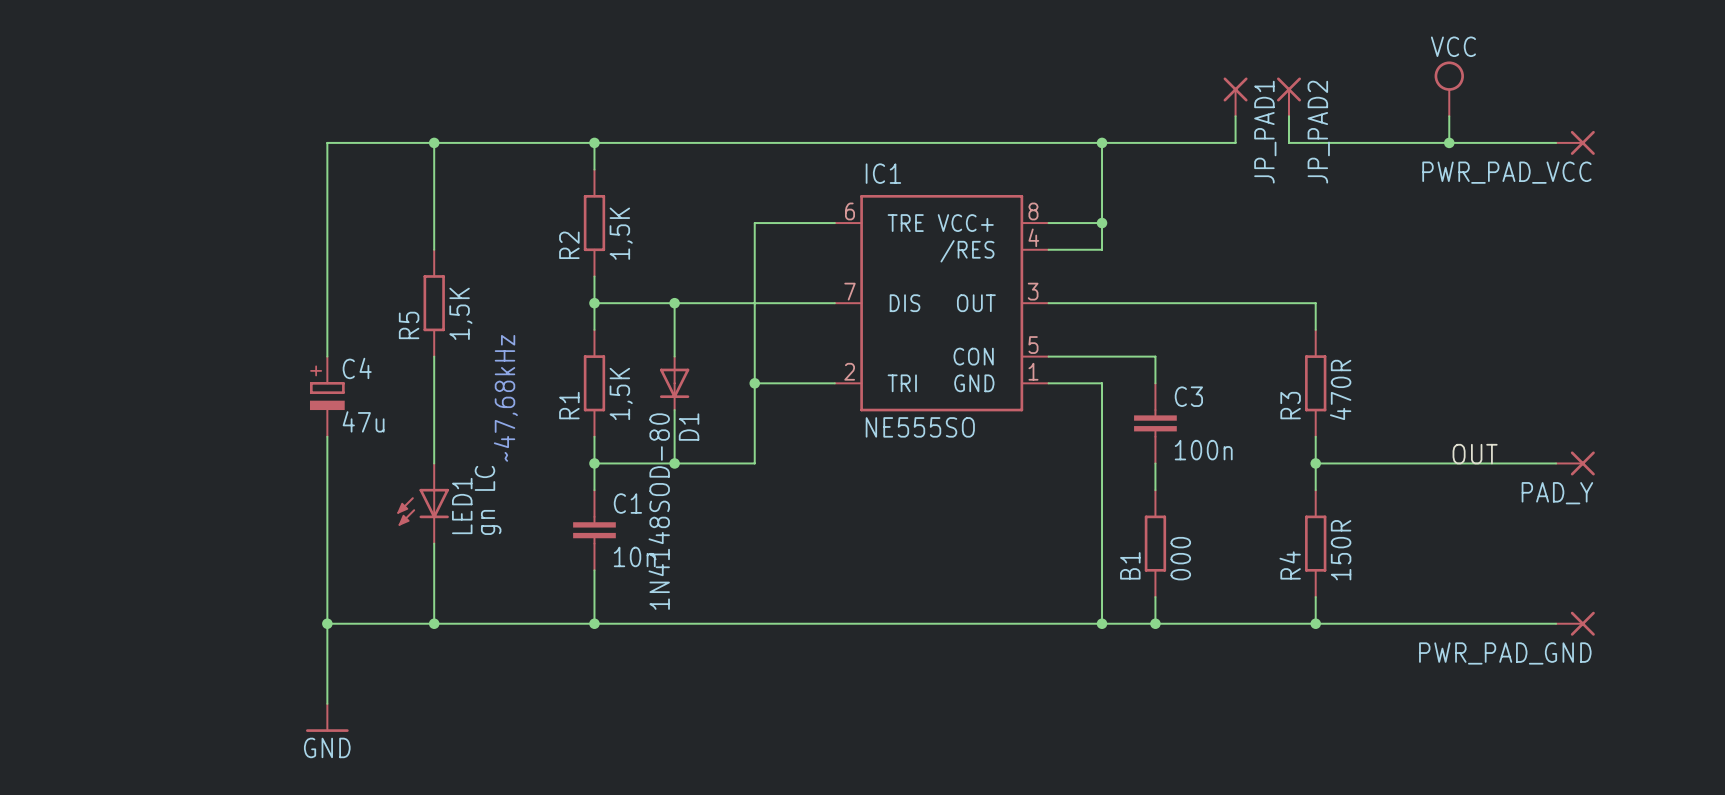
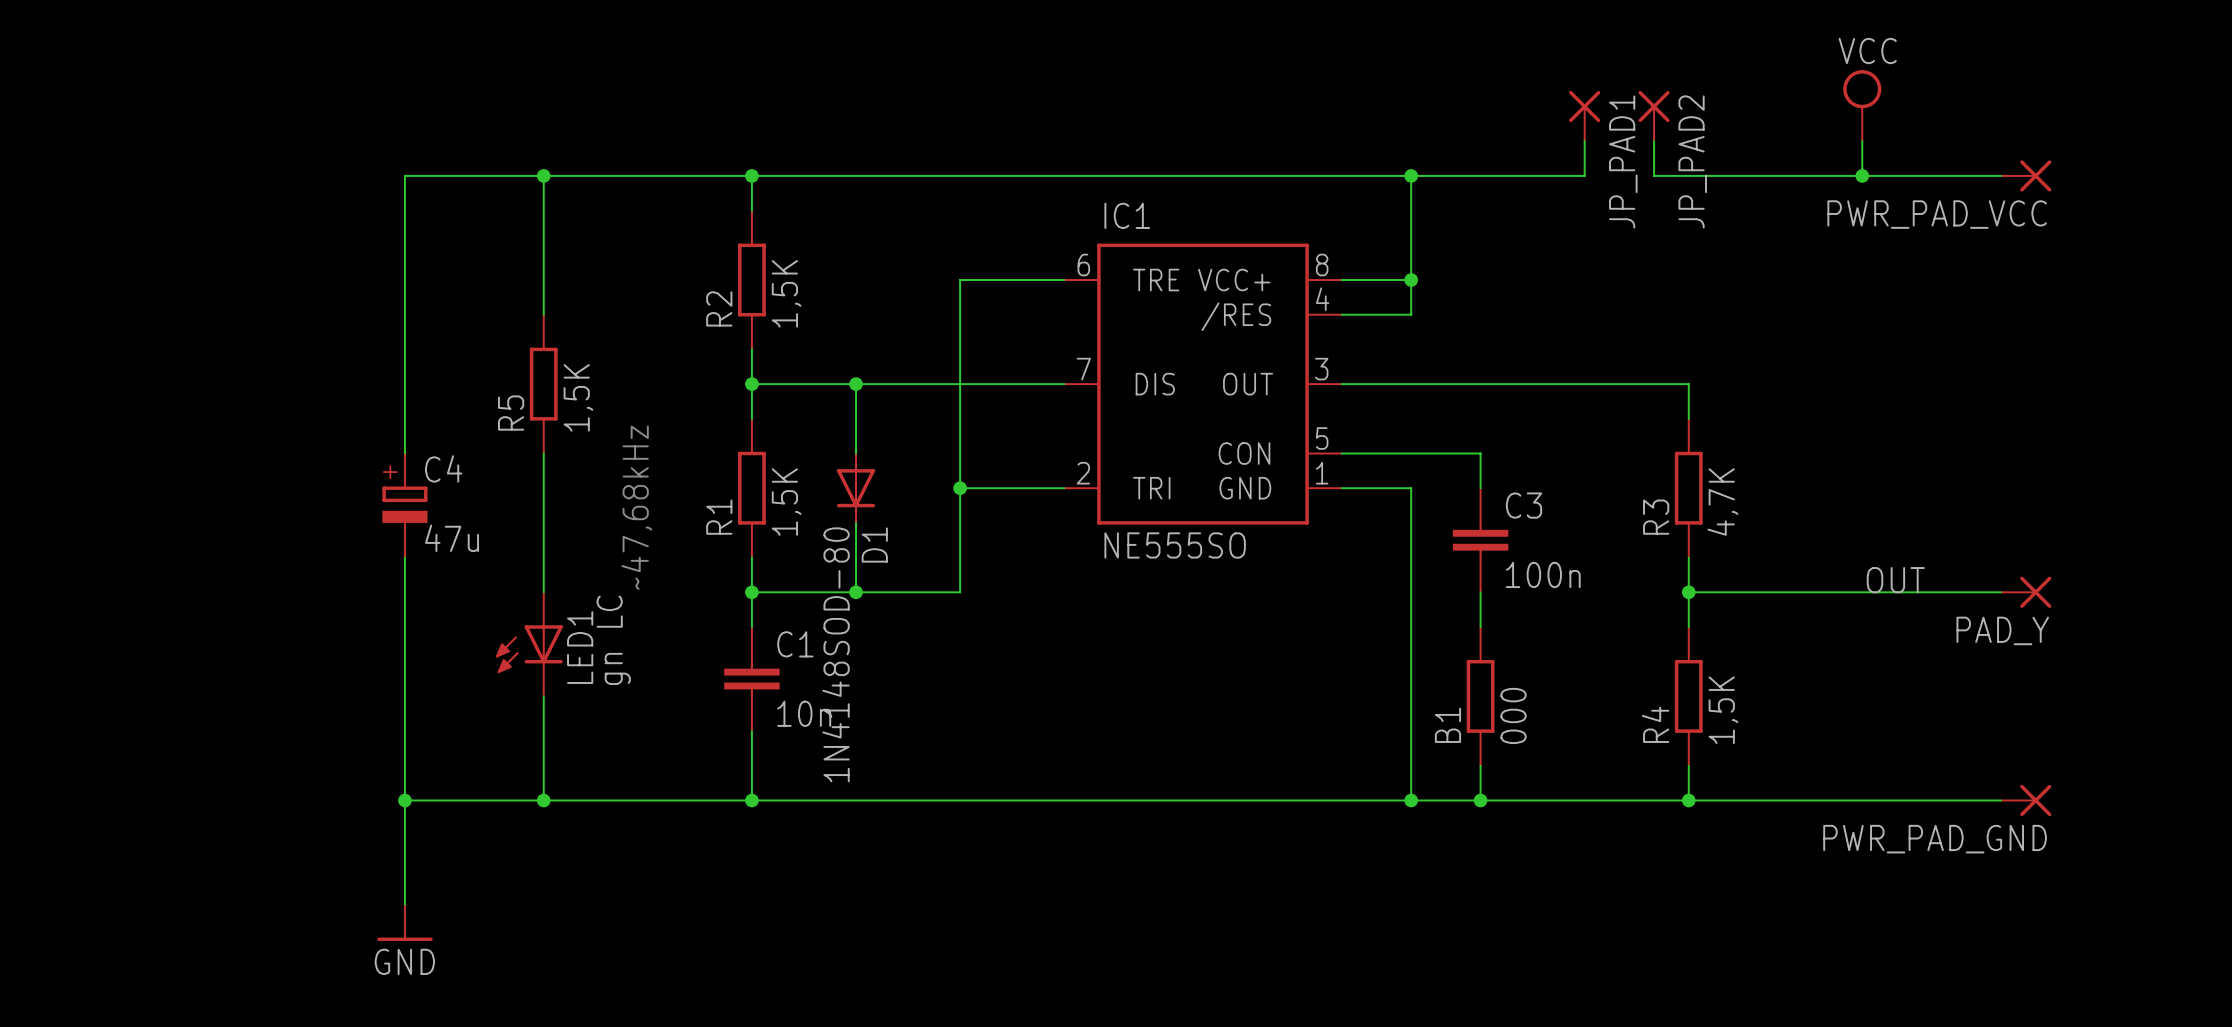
R3 value: 470R (1340, 389) -> 4,7K (1722, 502)
R4 value: 150R (1341, 550) -> 1,5K (1723, 710)

